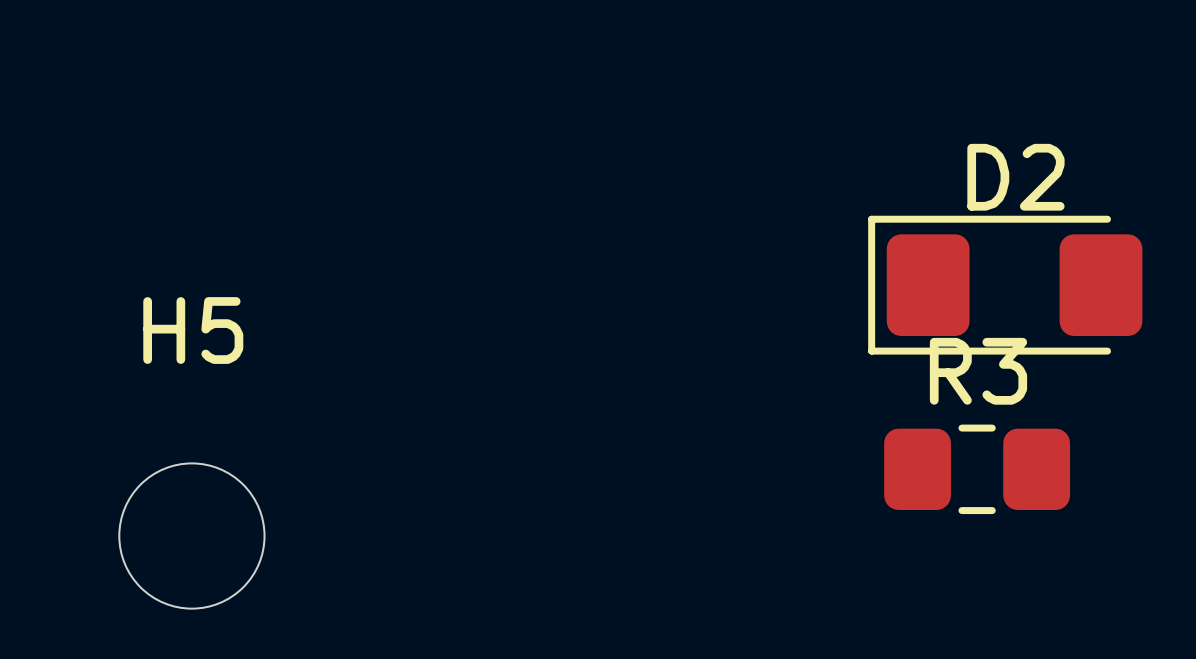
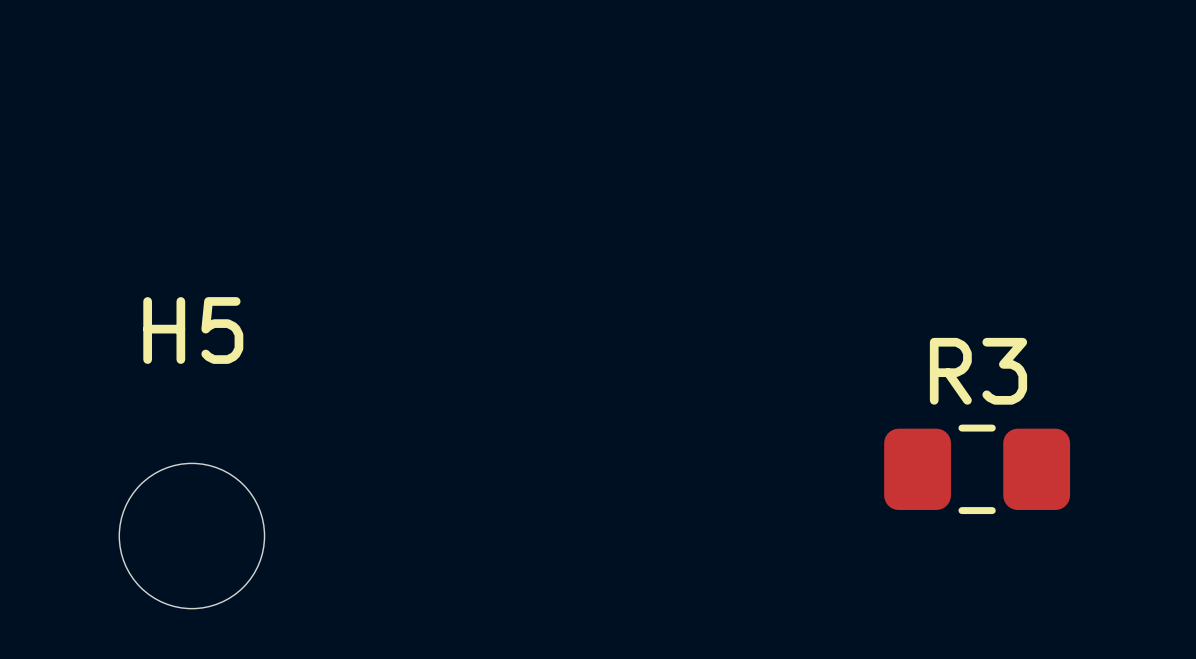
D2: (1005, 285) -> none

